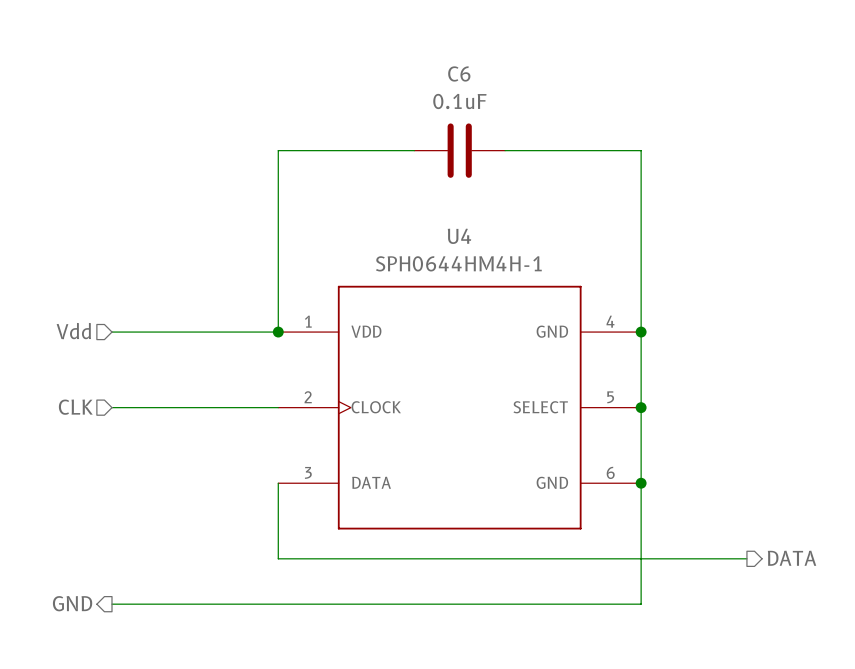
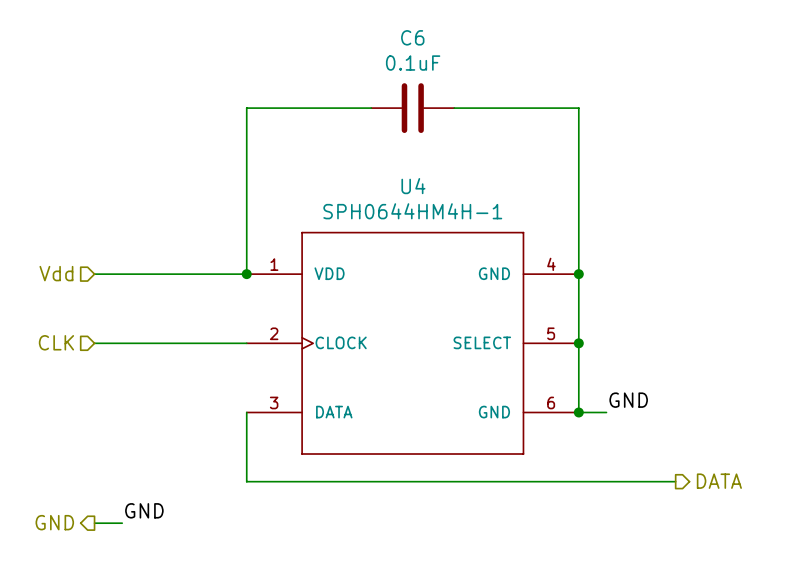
label: none -> GND (628, 400)
wire: (641, 483) (641, 604) (142, 604) -> (578, 412) (606, 412)
label: none -> GND (144, 510)

